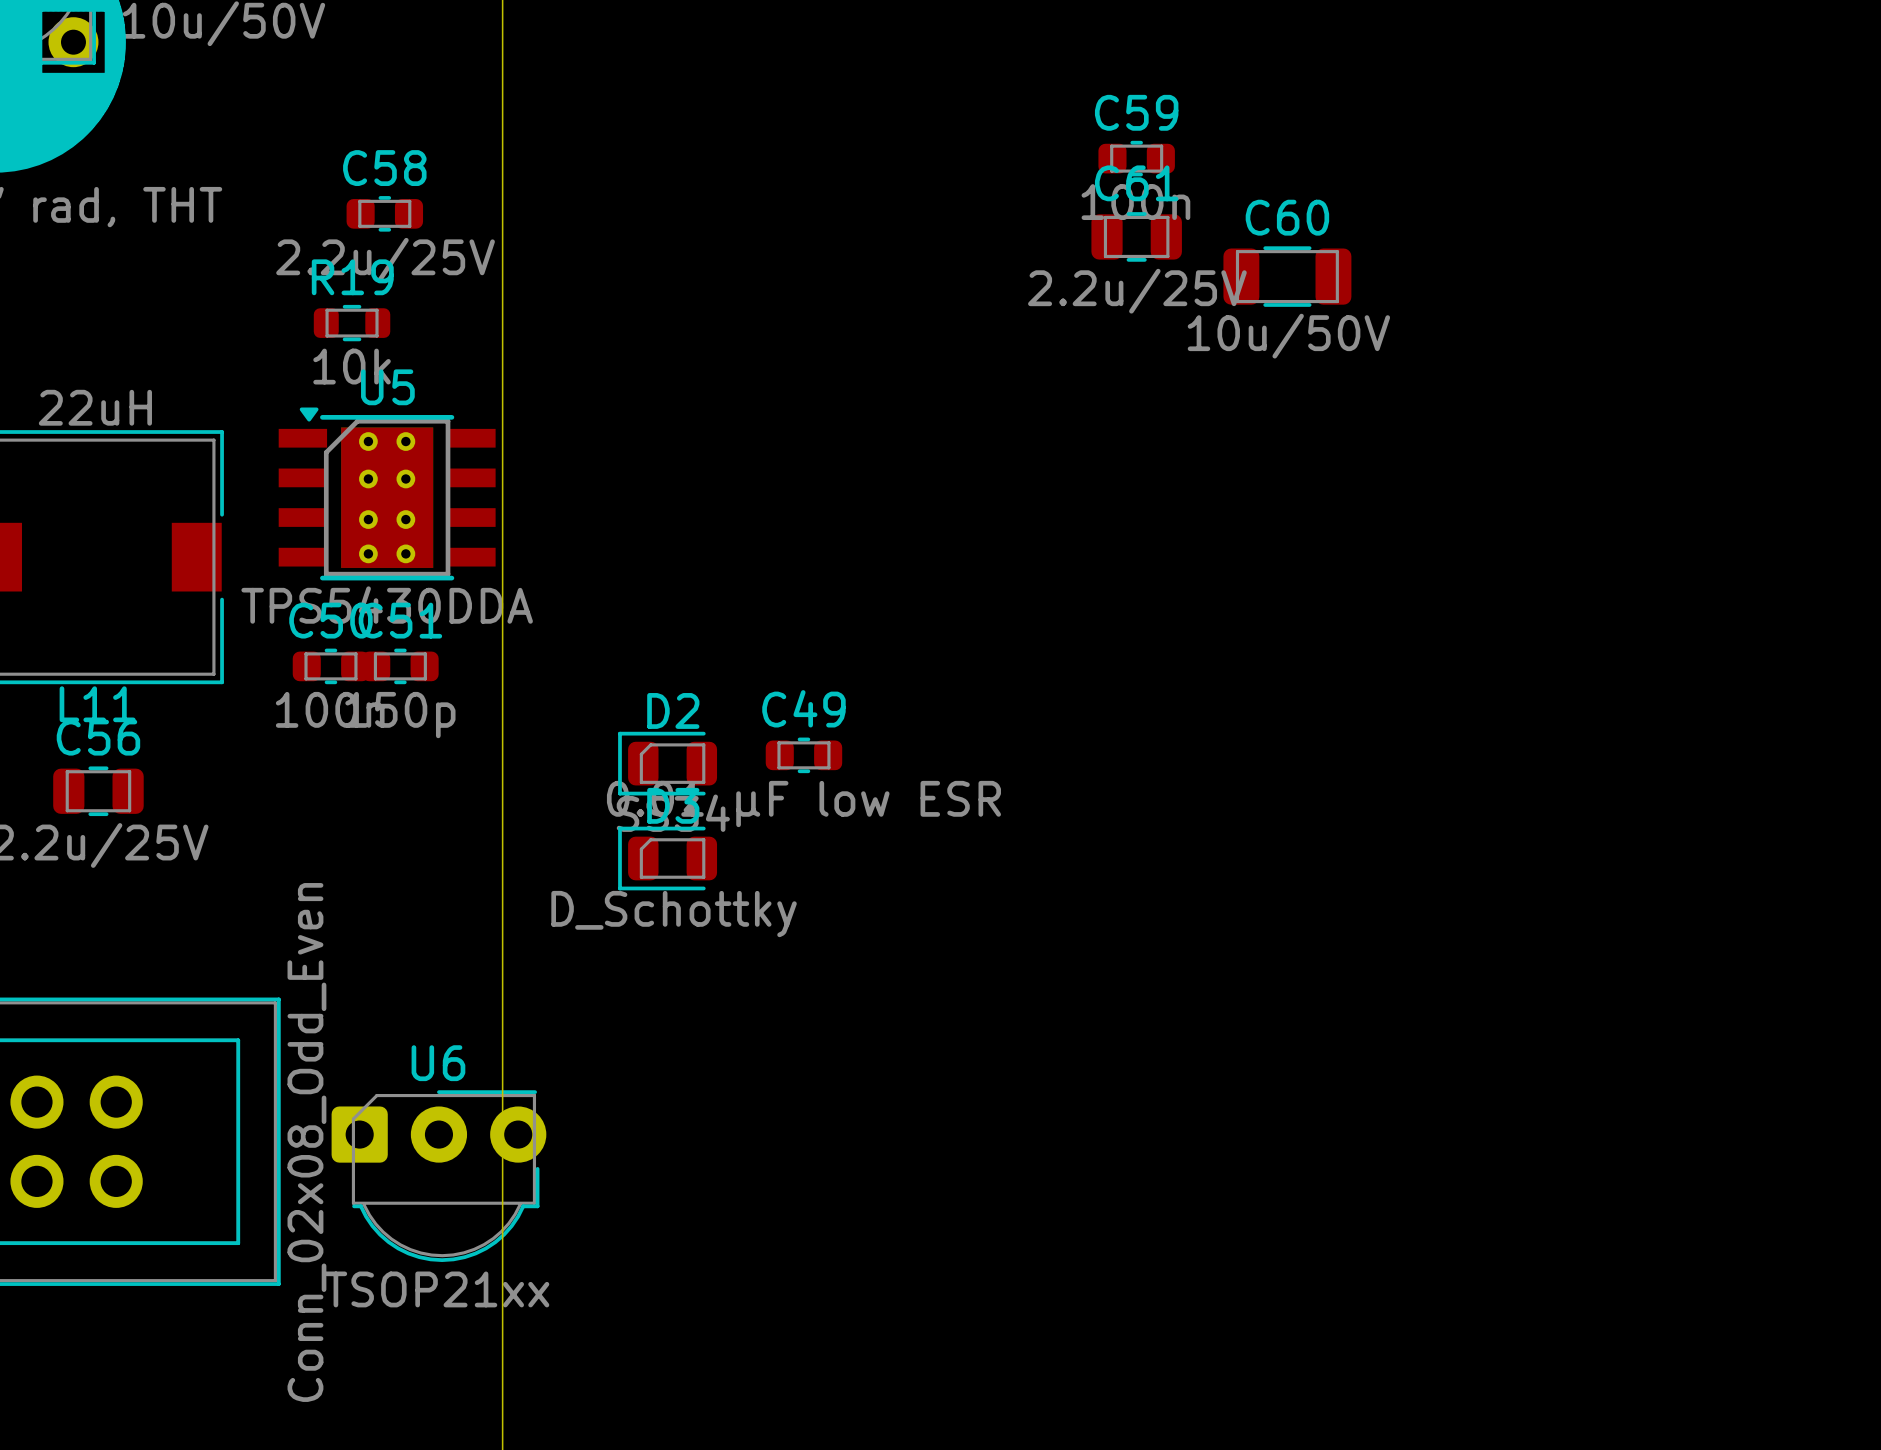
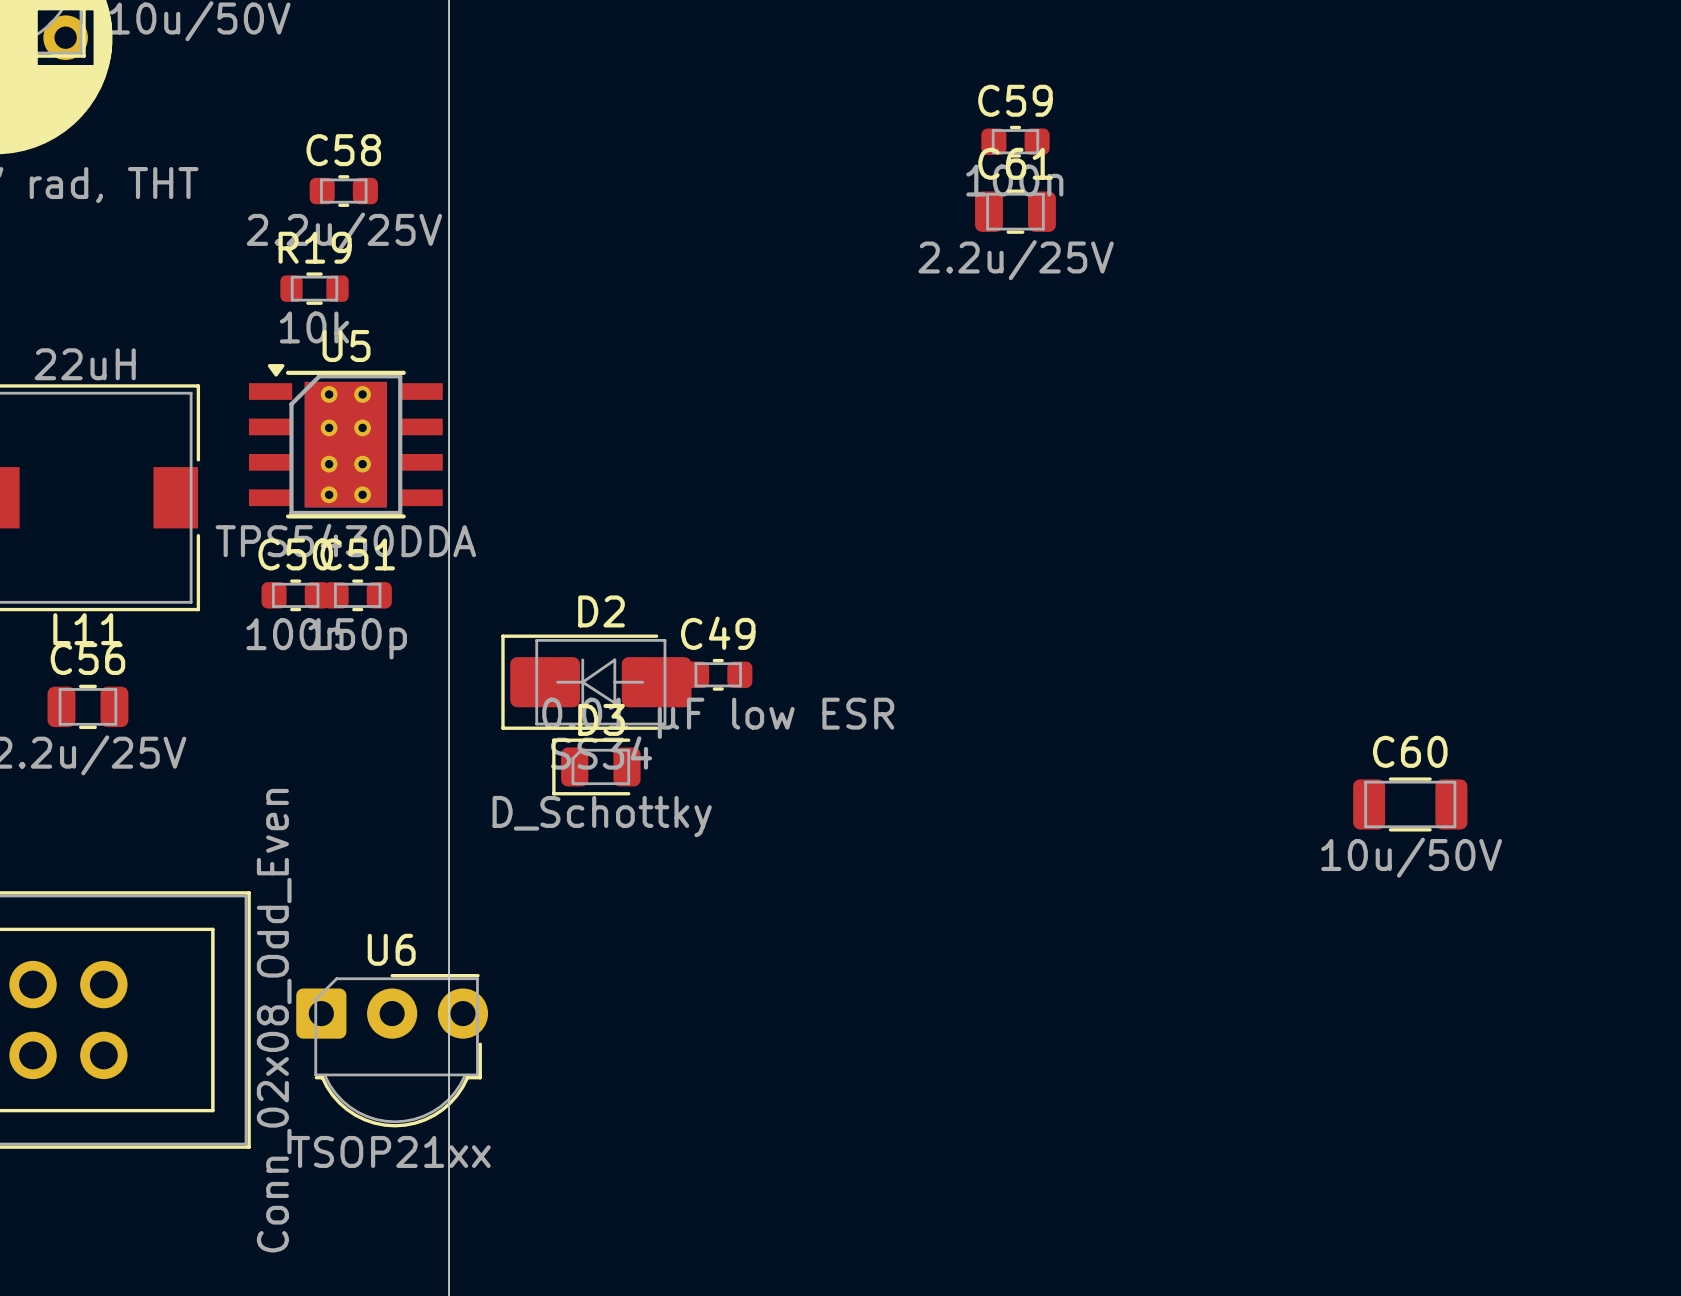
C60 position: (1287, 276) -> (1410, 804)
D2 footprint: [618, 731, 718, 796] -> [501, 634, 692, 730]

